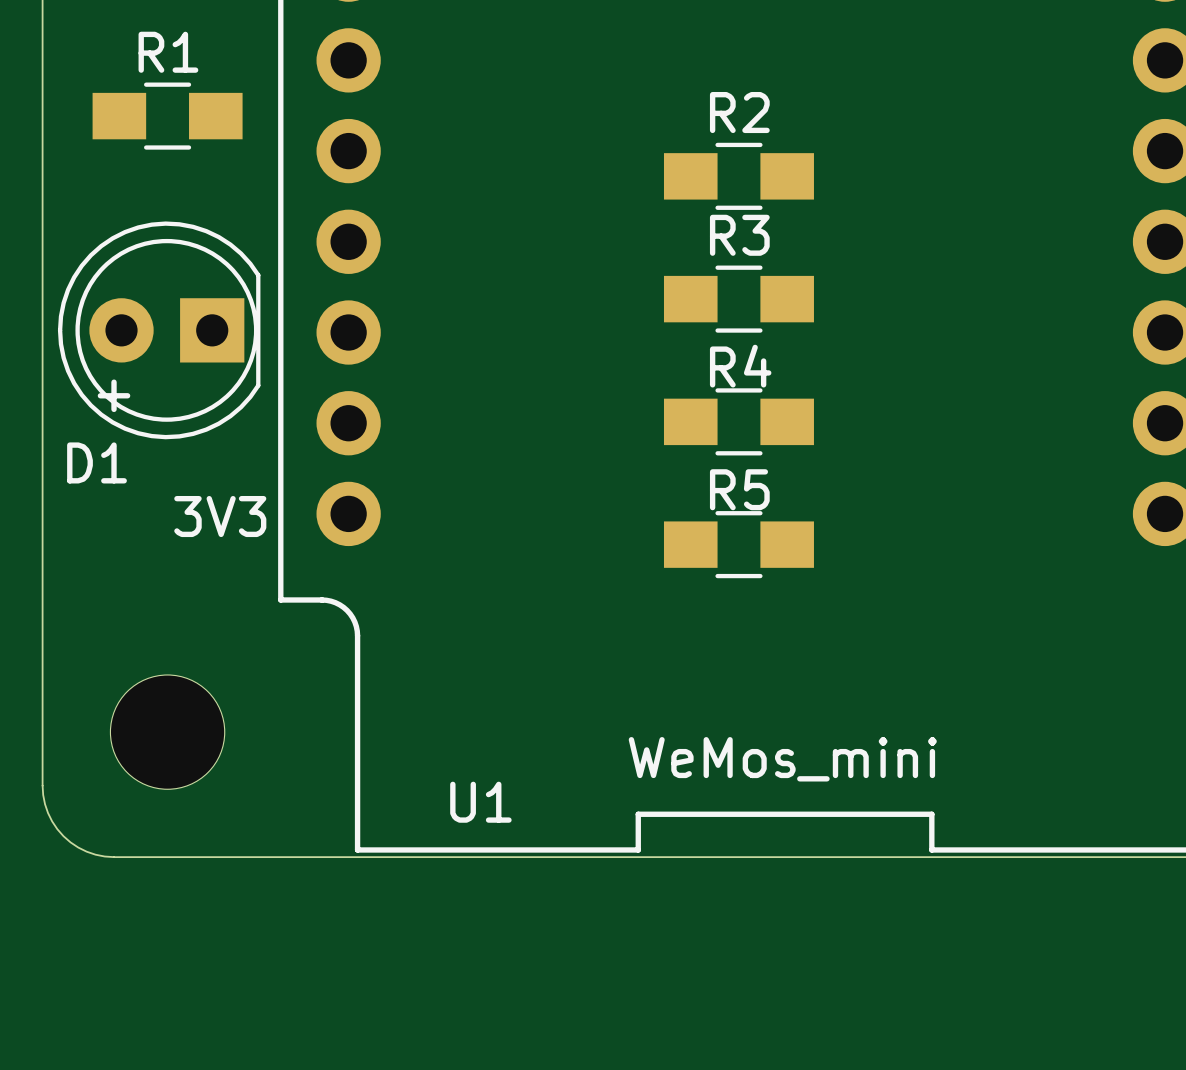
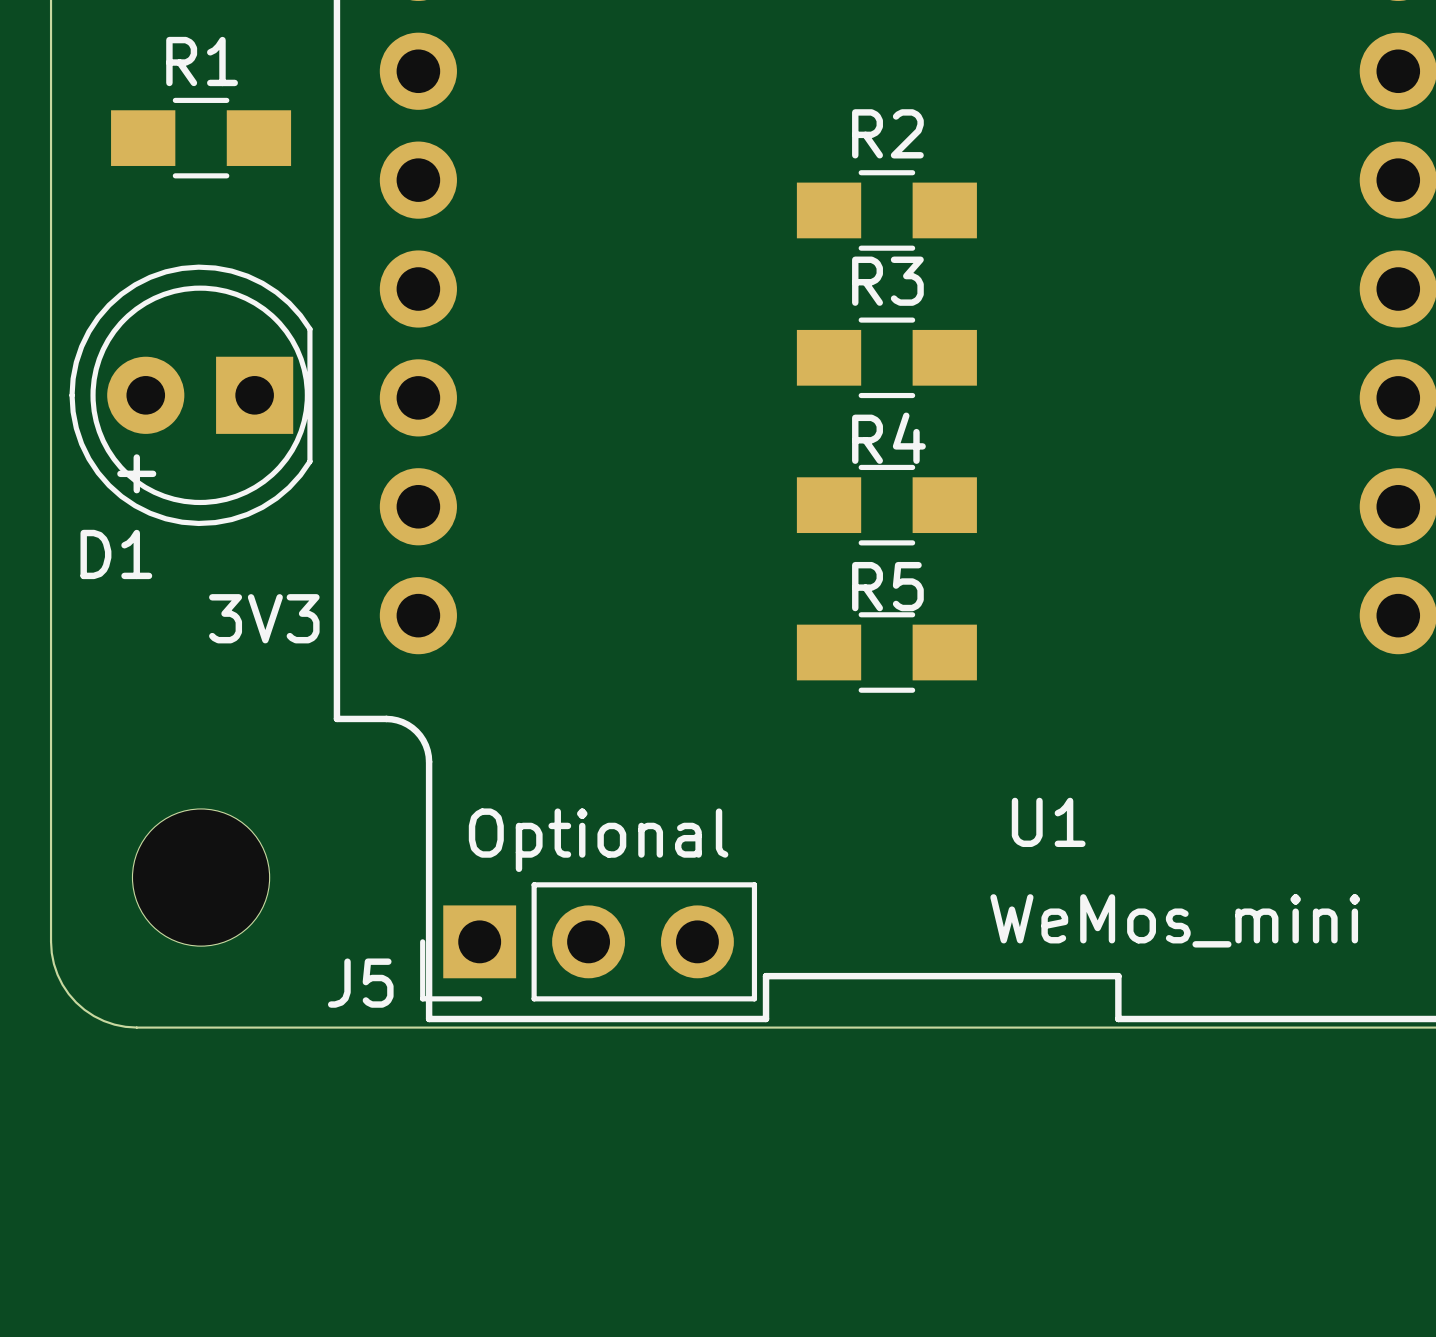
text: none -> Optional (598, 840)
U1 value position: WeMos_mini (782, 759) -> WeMos_mini (1175, 920)
J5: none -> (588, 941)
U1 name position: U1 (480, 802) -> U1 (1048, 822)

